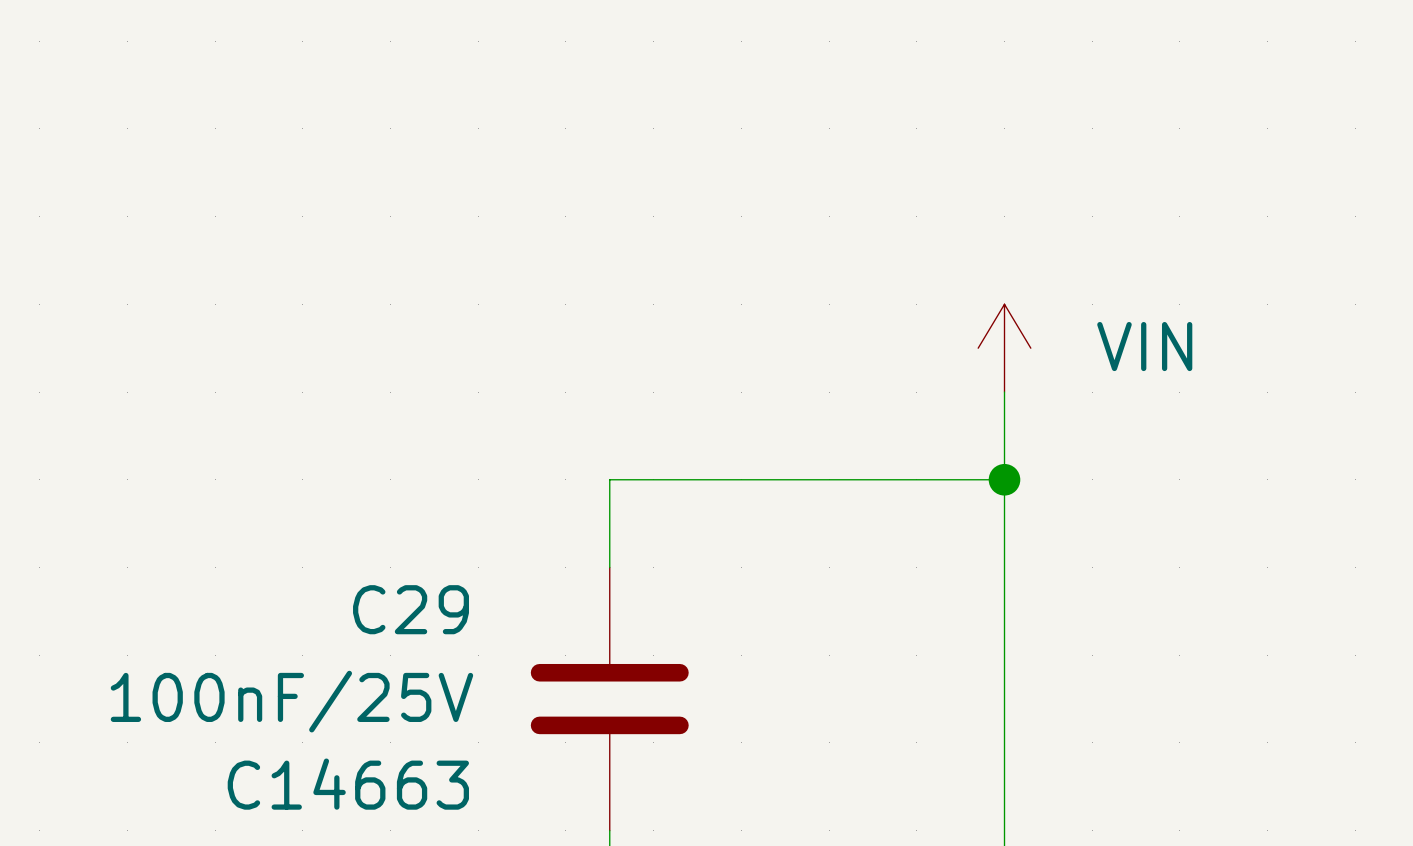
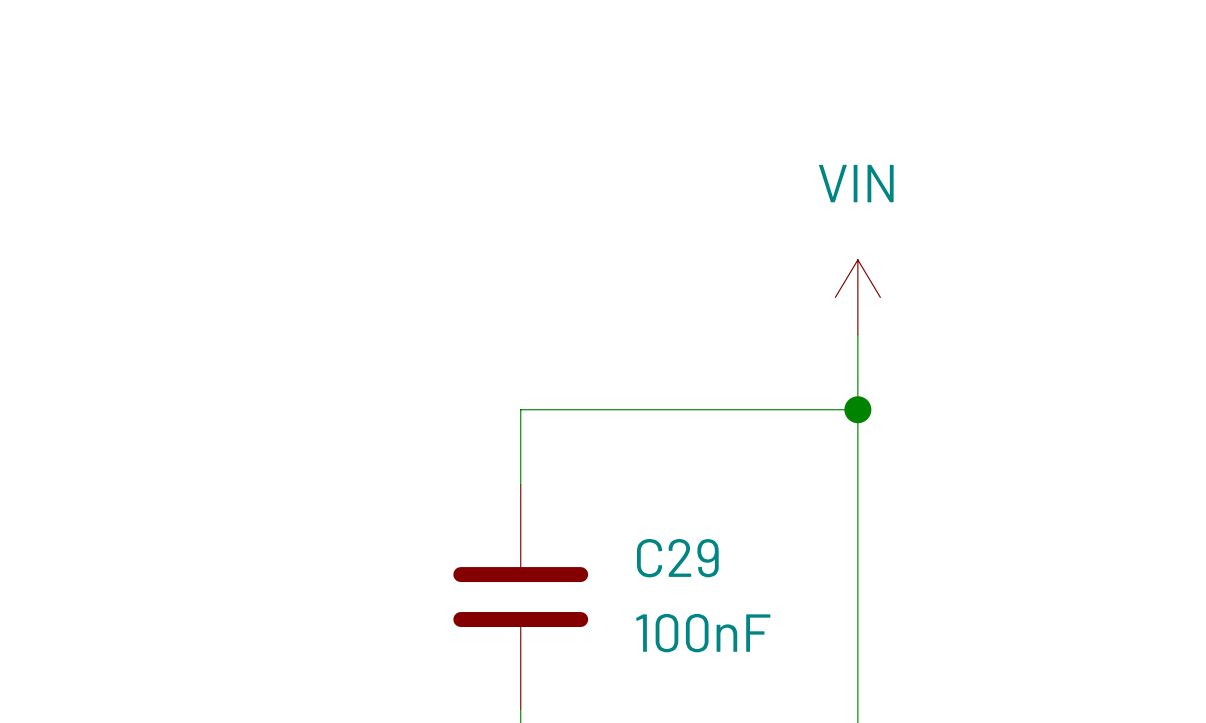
power symbol text position: VIN (1144, 346) -> VIN (856, 183)
C29 name position: C29 (411, 609) -> C29 (677, 558)
C29 value: 100nF/25V (291, 701) -> 100nF (703, 633)
C29 text: C14663 (348, 784) -> none

